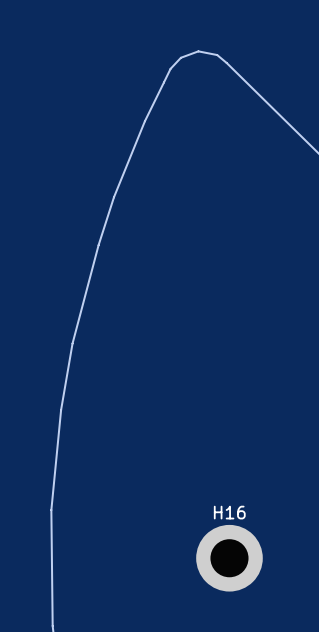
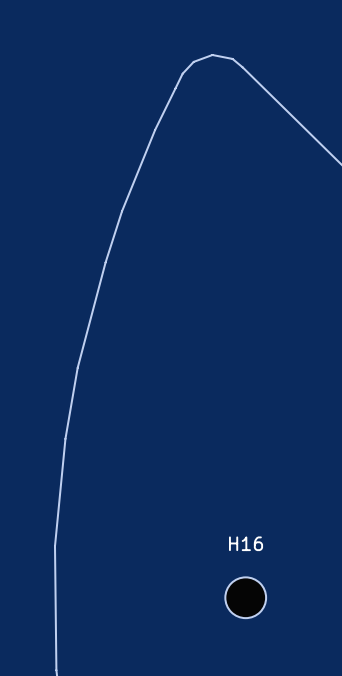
H16 footprint: [196, 524, 263, 592] -> [225, 577, 267, 619]

